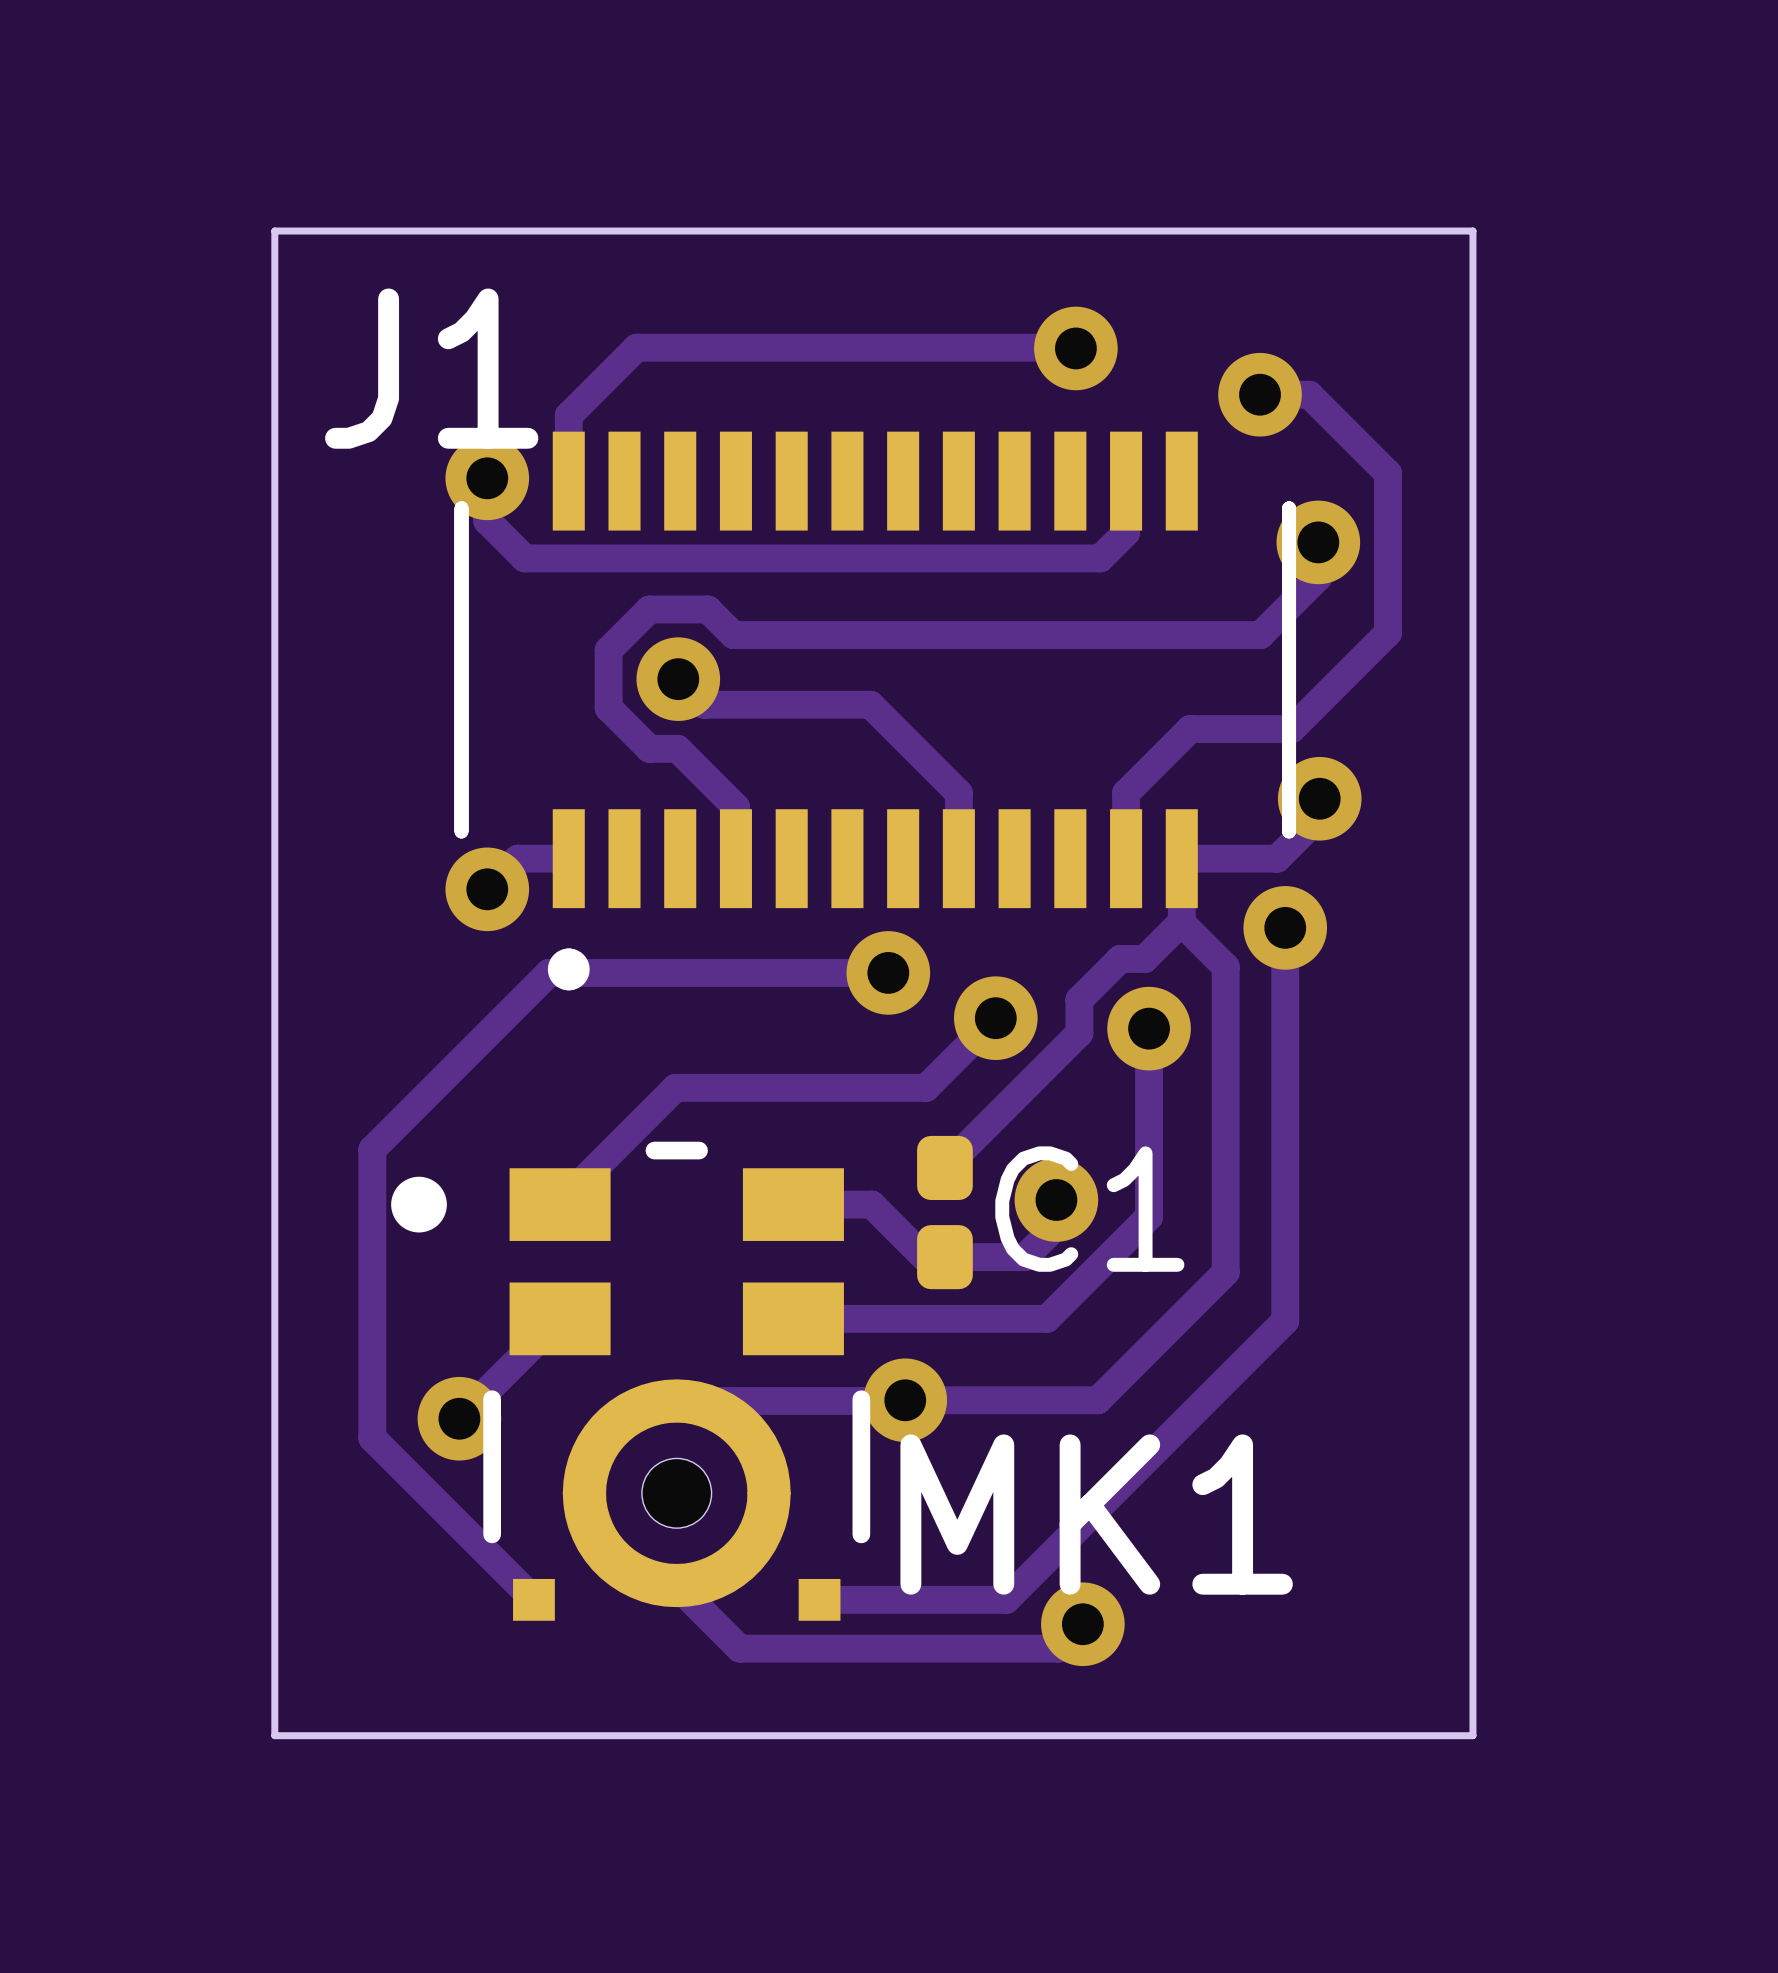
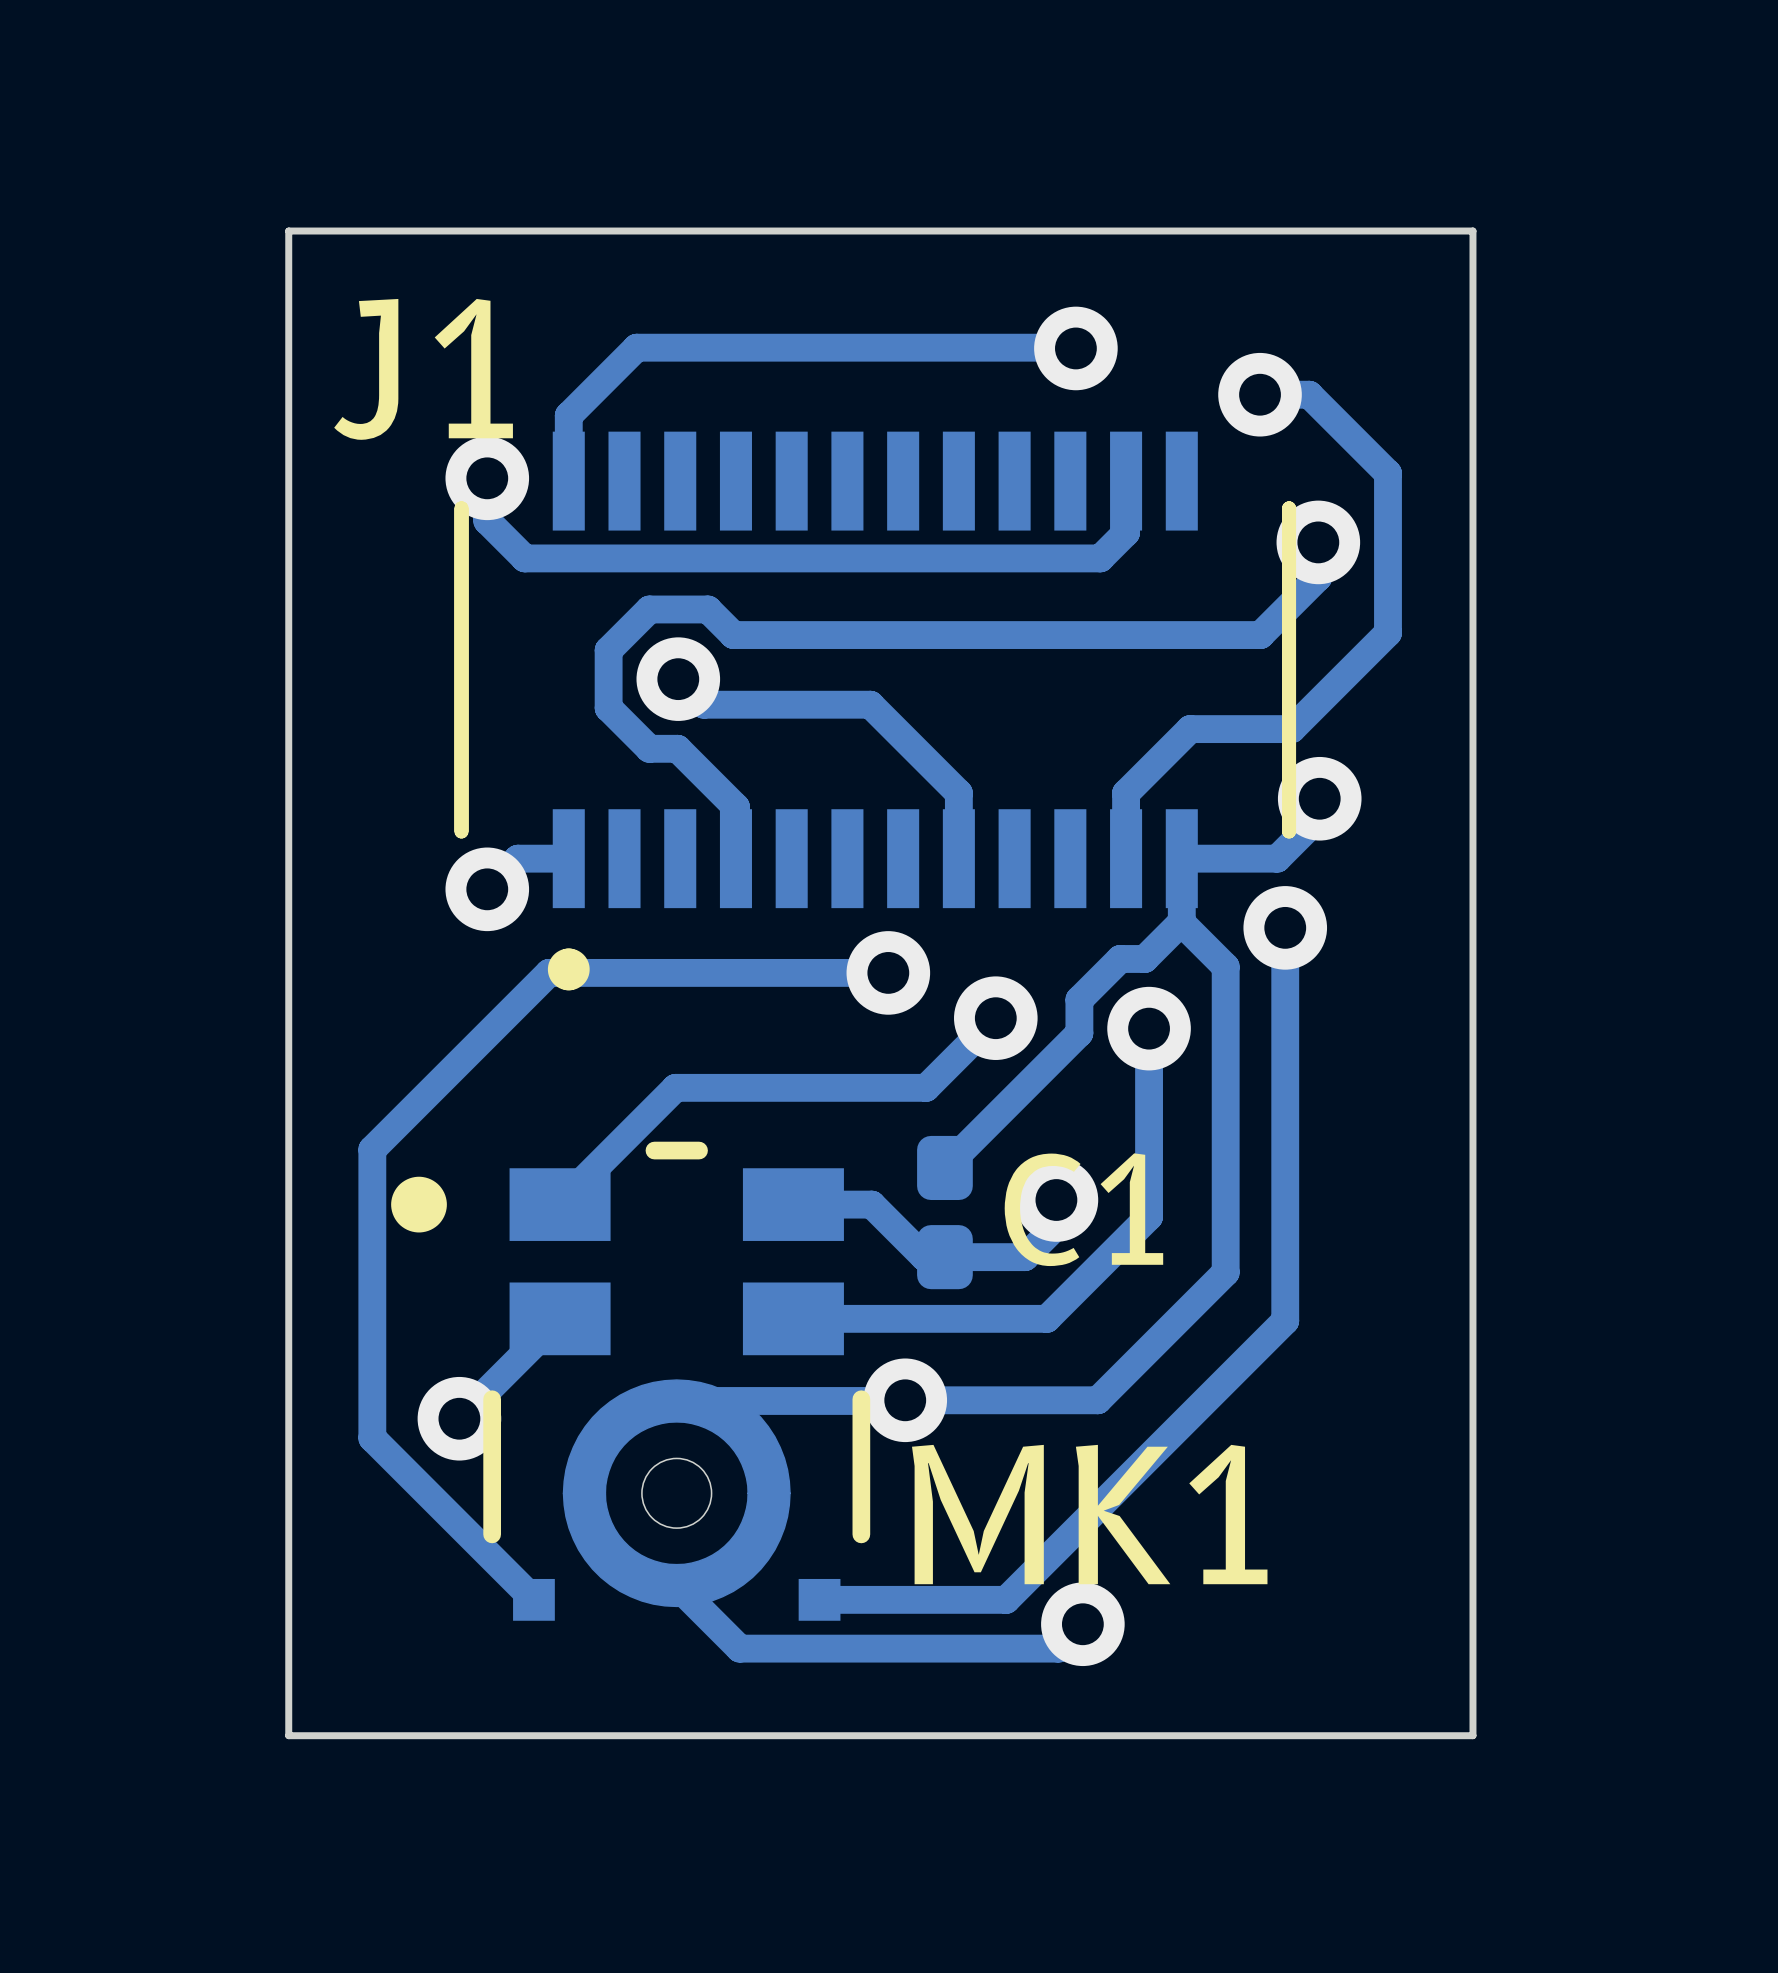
board edge: (288, 231) (274, 231) (274, 1735) (288, 1735) -> (288, 231) (288, 1735)

